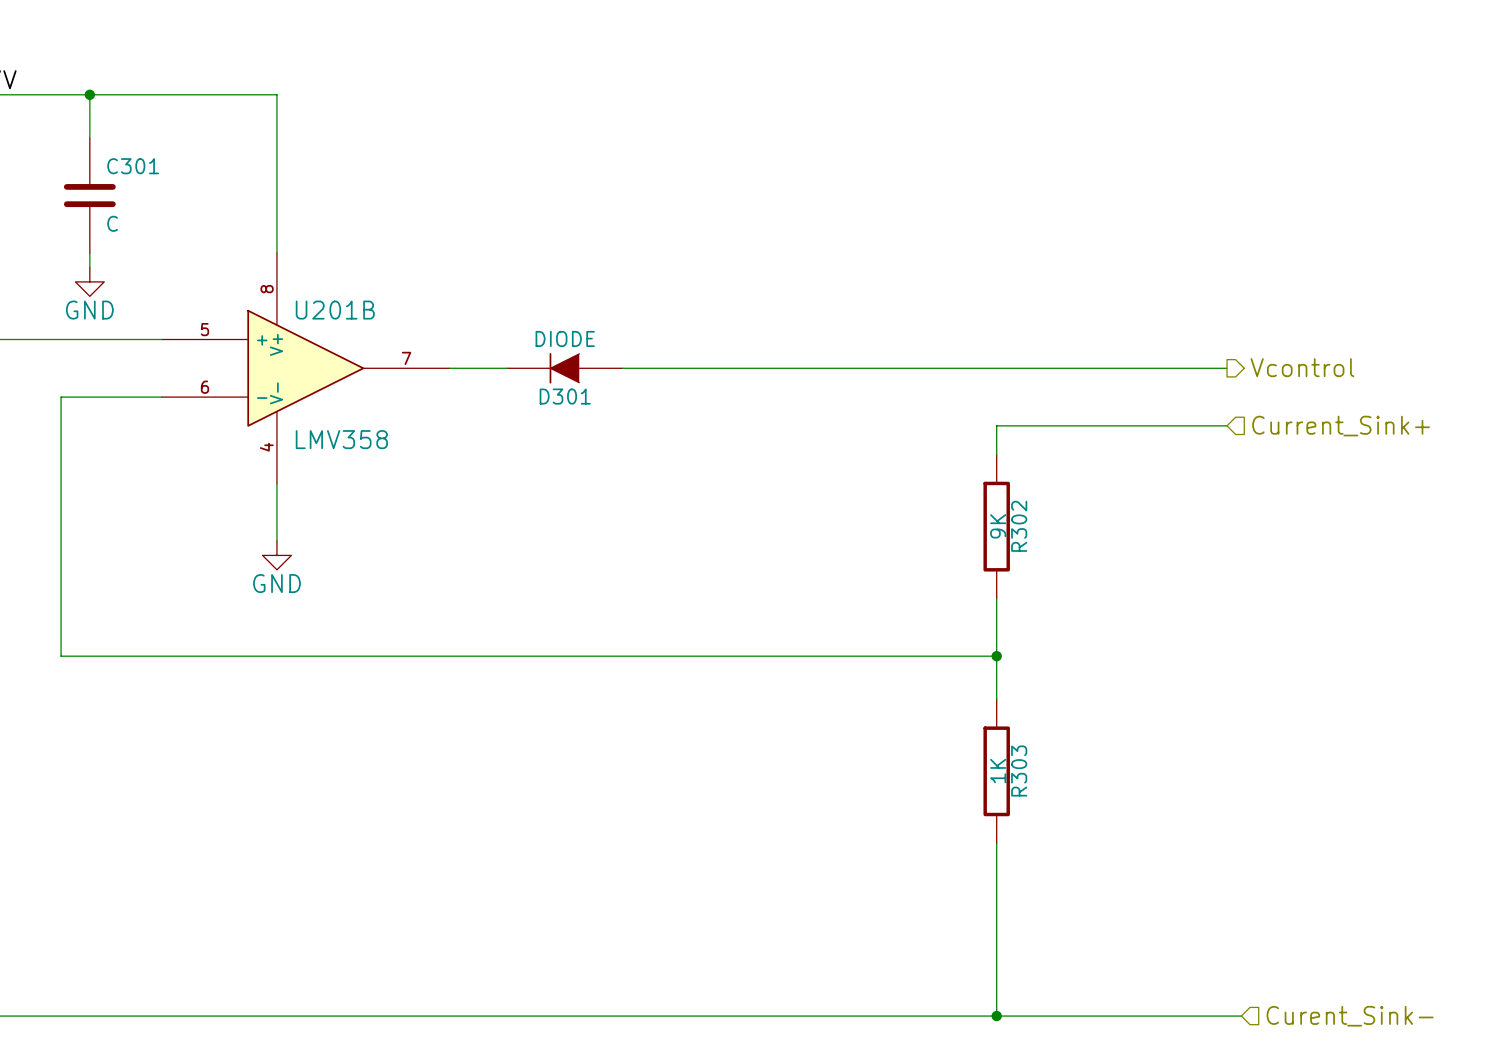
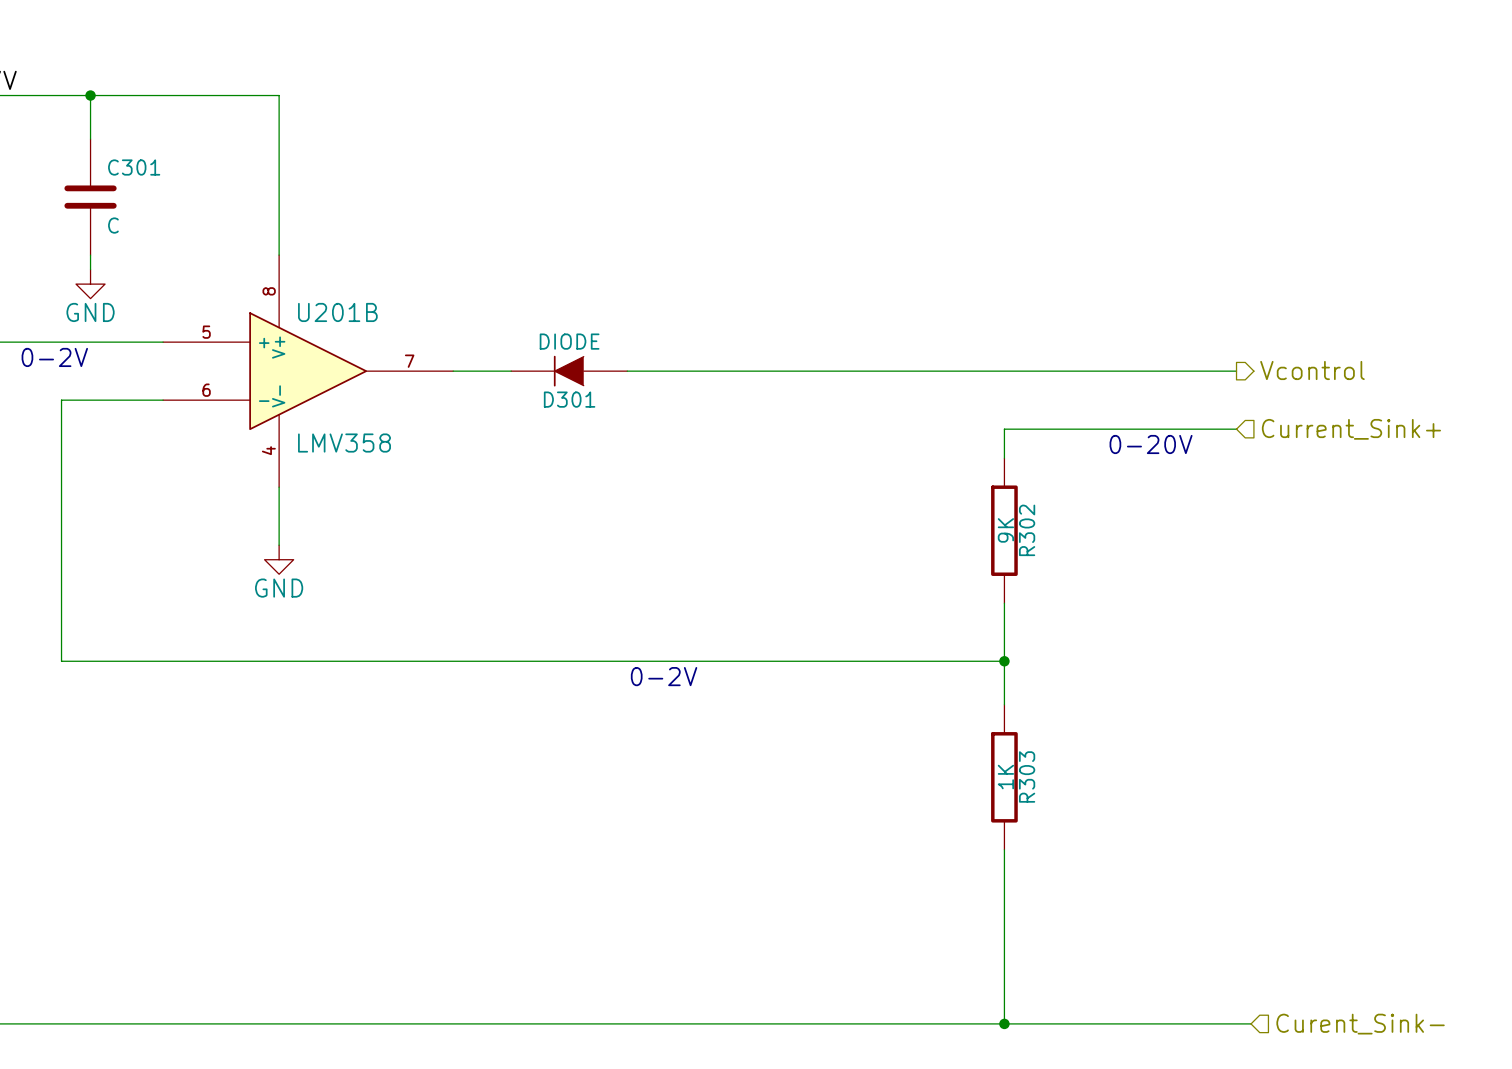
text: none -> 0-2V (54, 357)
text: none -> 0-20V (1151, 444)
text: none -> 0-2V (664, 676)

